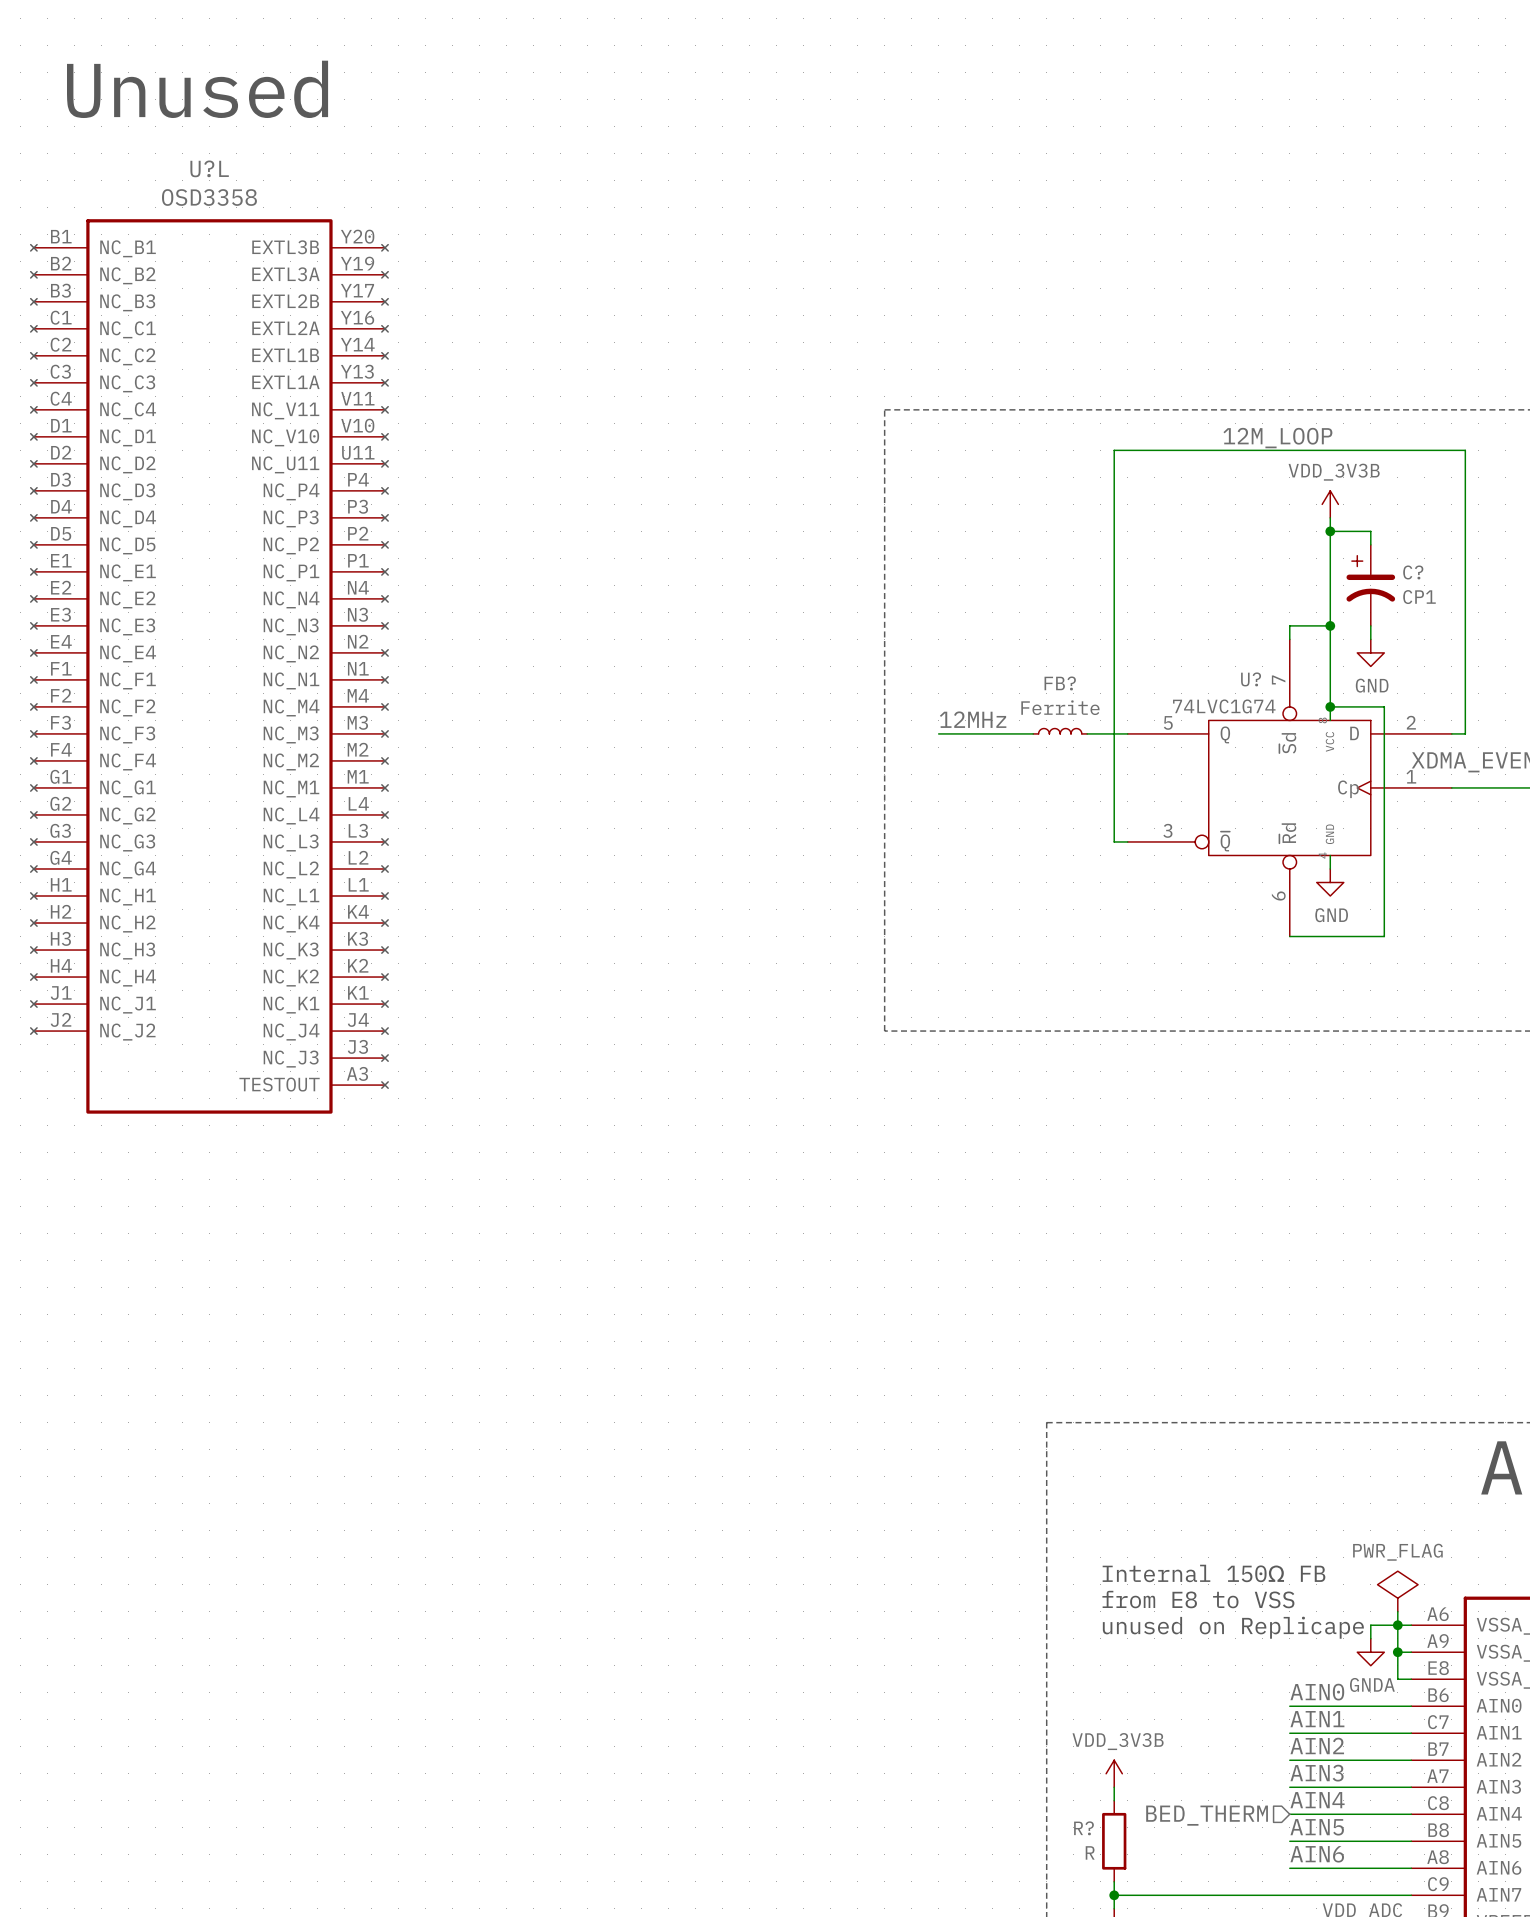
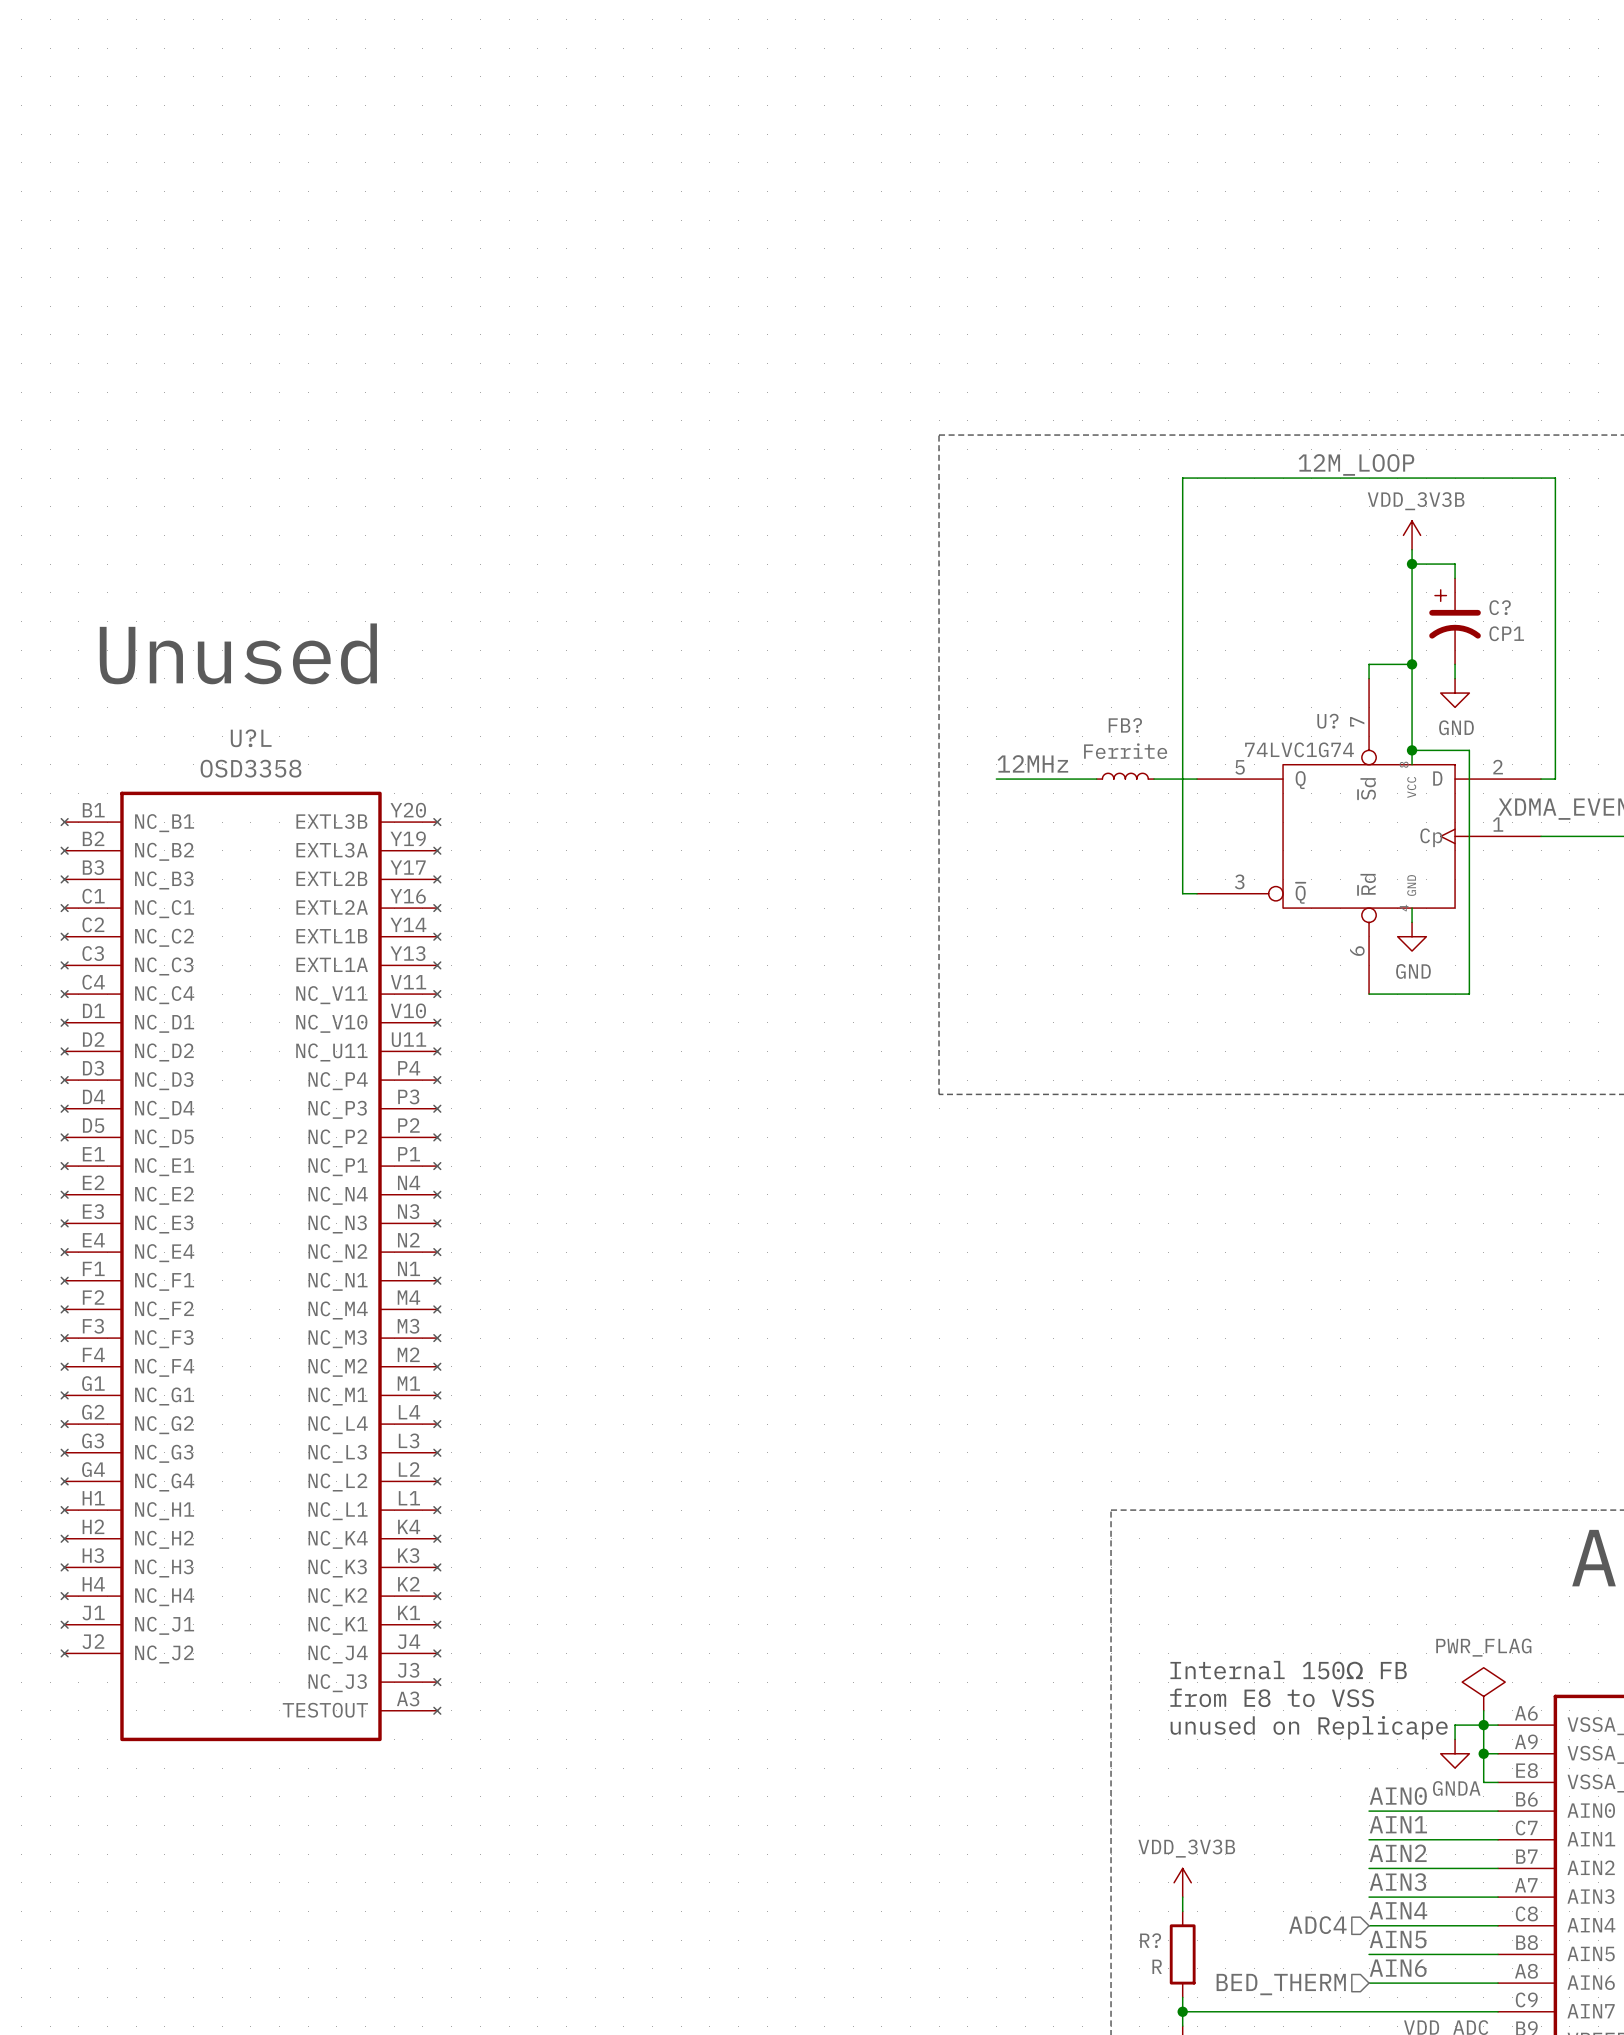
text: Unused (197, 89) -> none
text: none -> Unused (238, 653)
U?L: OSD3358 (209, 666) -> none
U?L: none -> OSD3358 (250, 1266)
hierarchical label: BED_THERM (1207, 1815) -> ADC4 (1317, 1925)
hierarchical label: none -> BED_THERM (1281, 1984)

